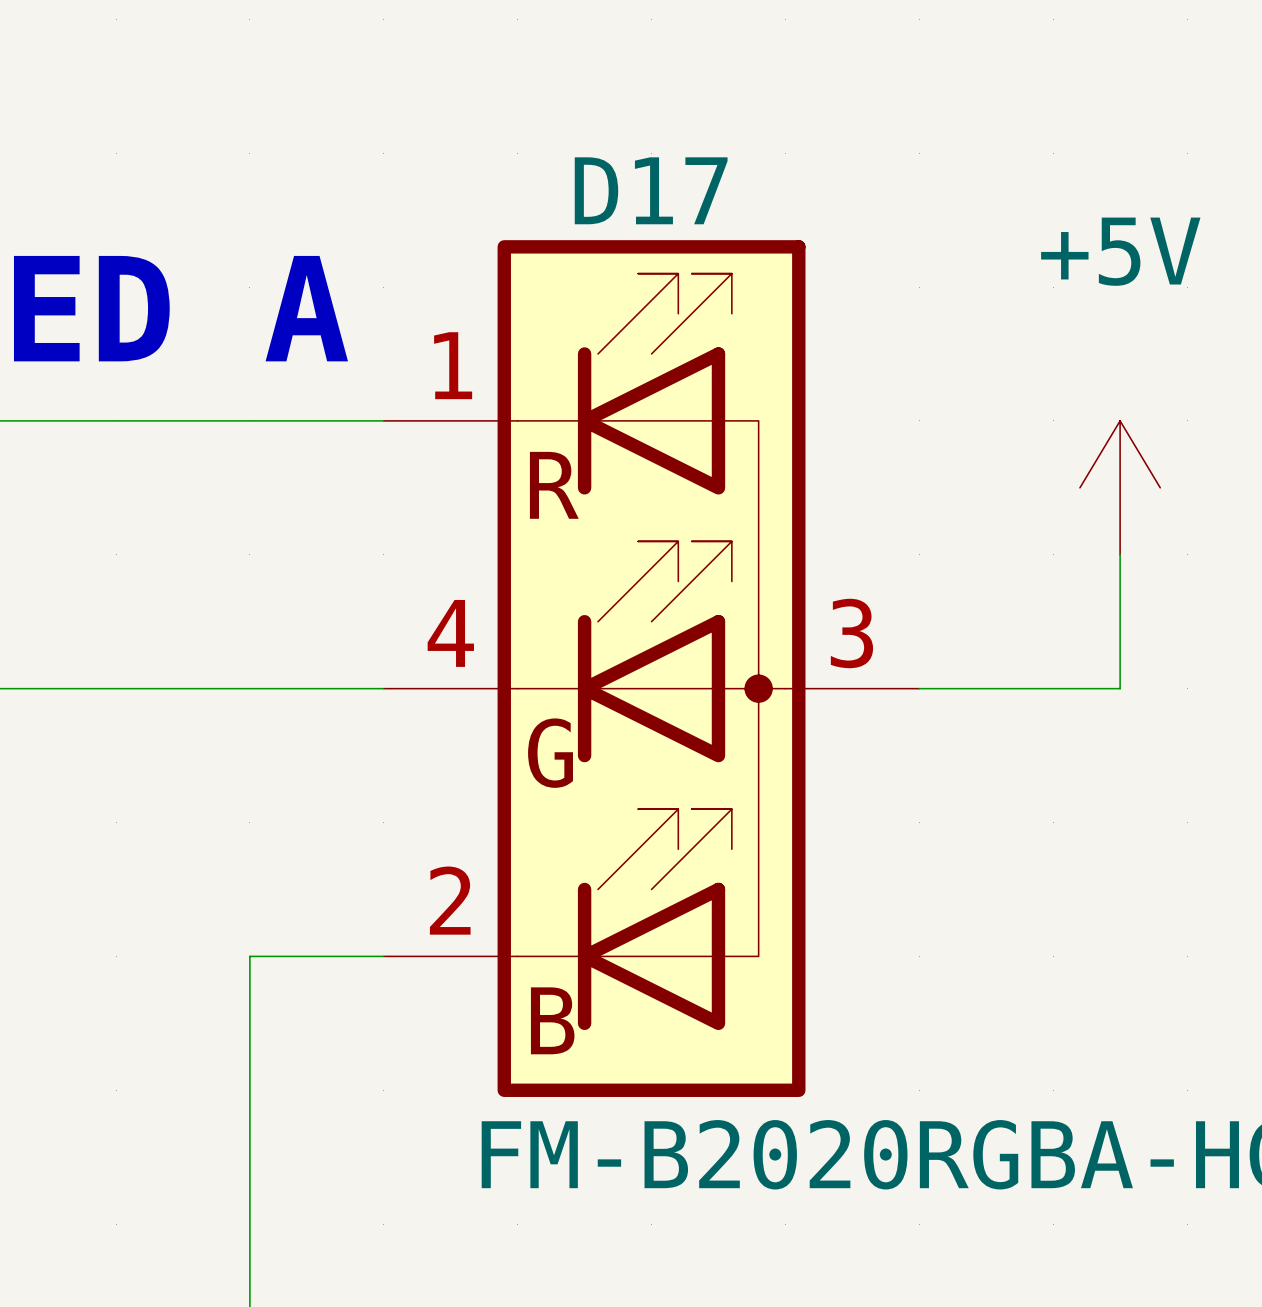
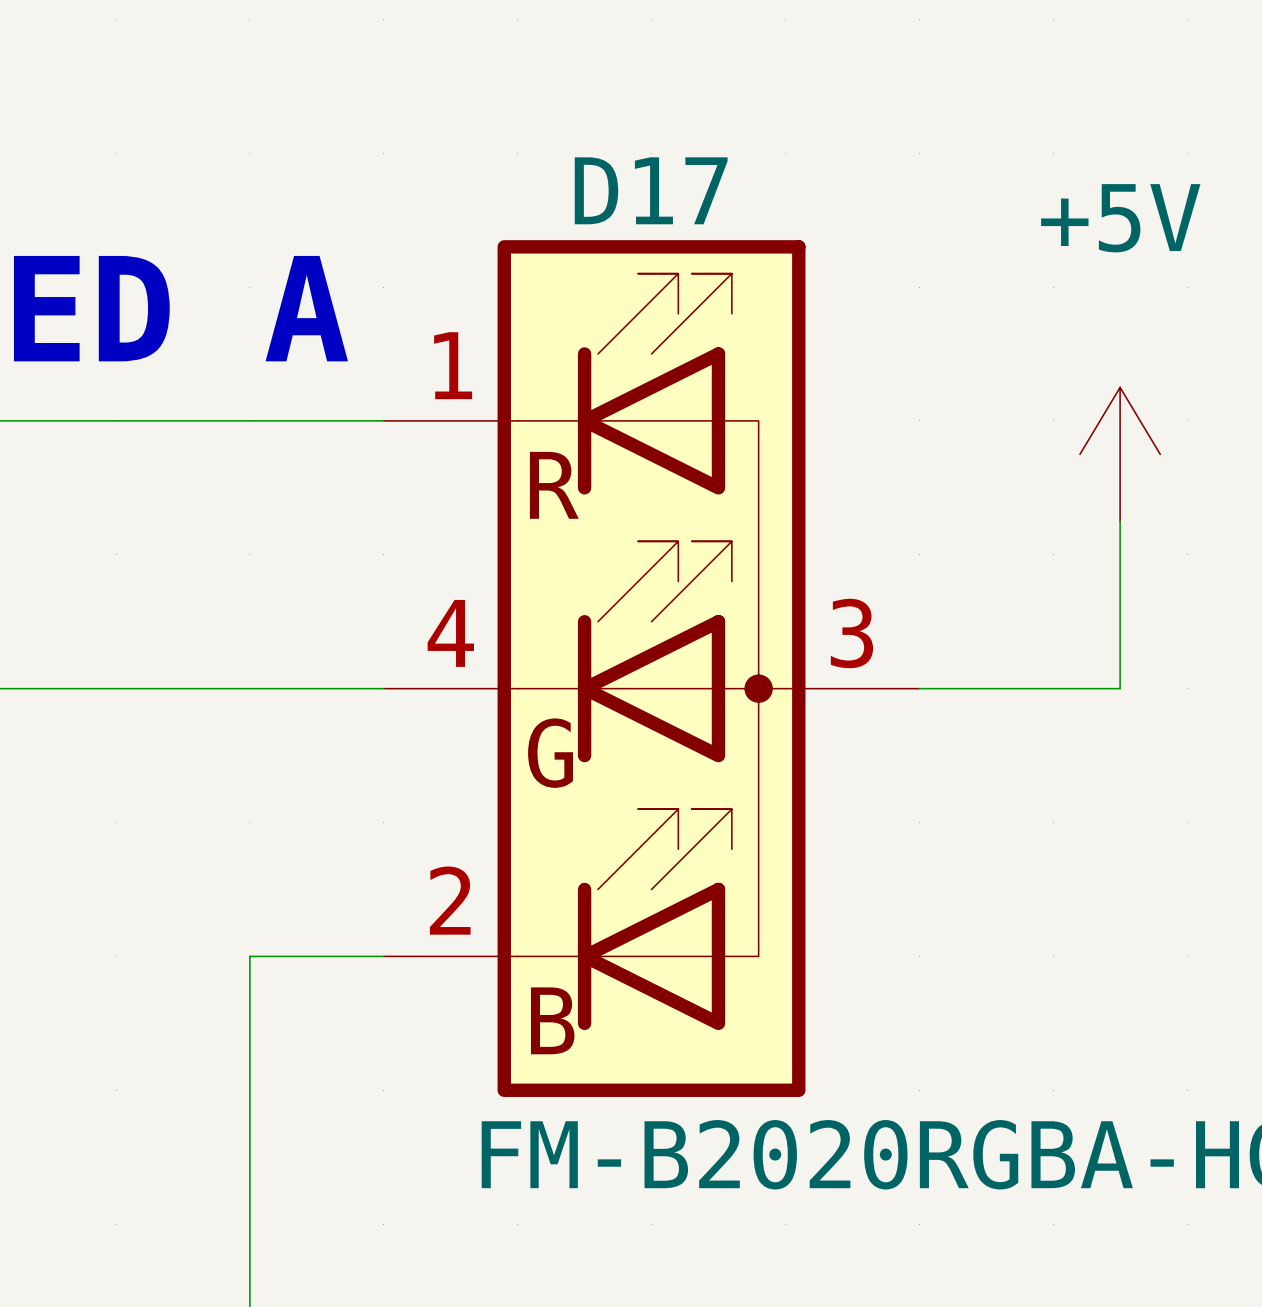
power symbol position: +5V (1120, 487) -> +5V (1120, 454)

